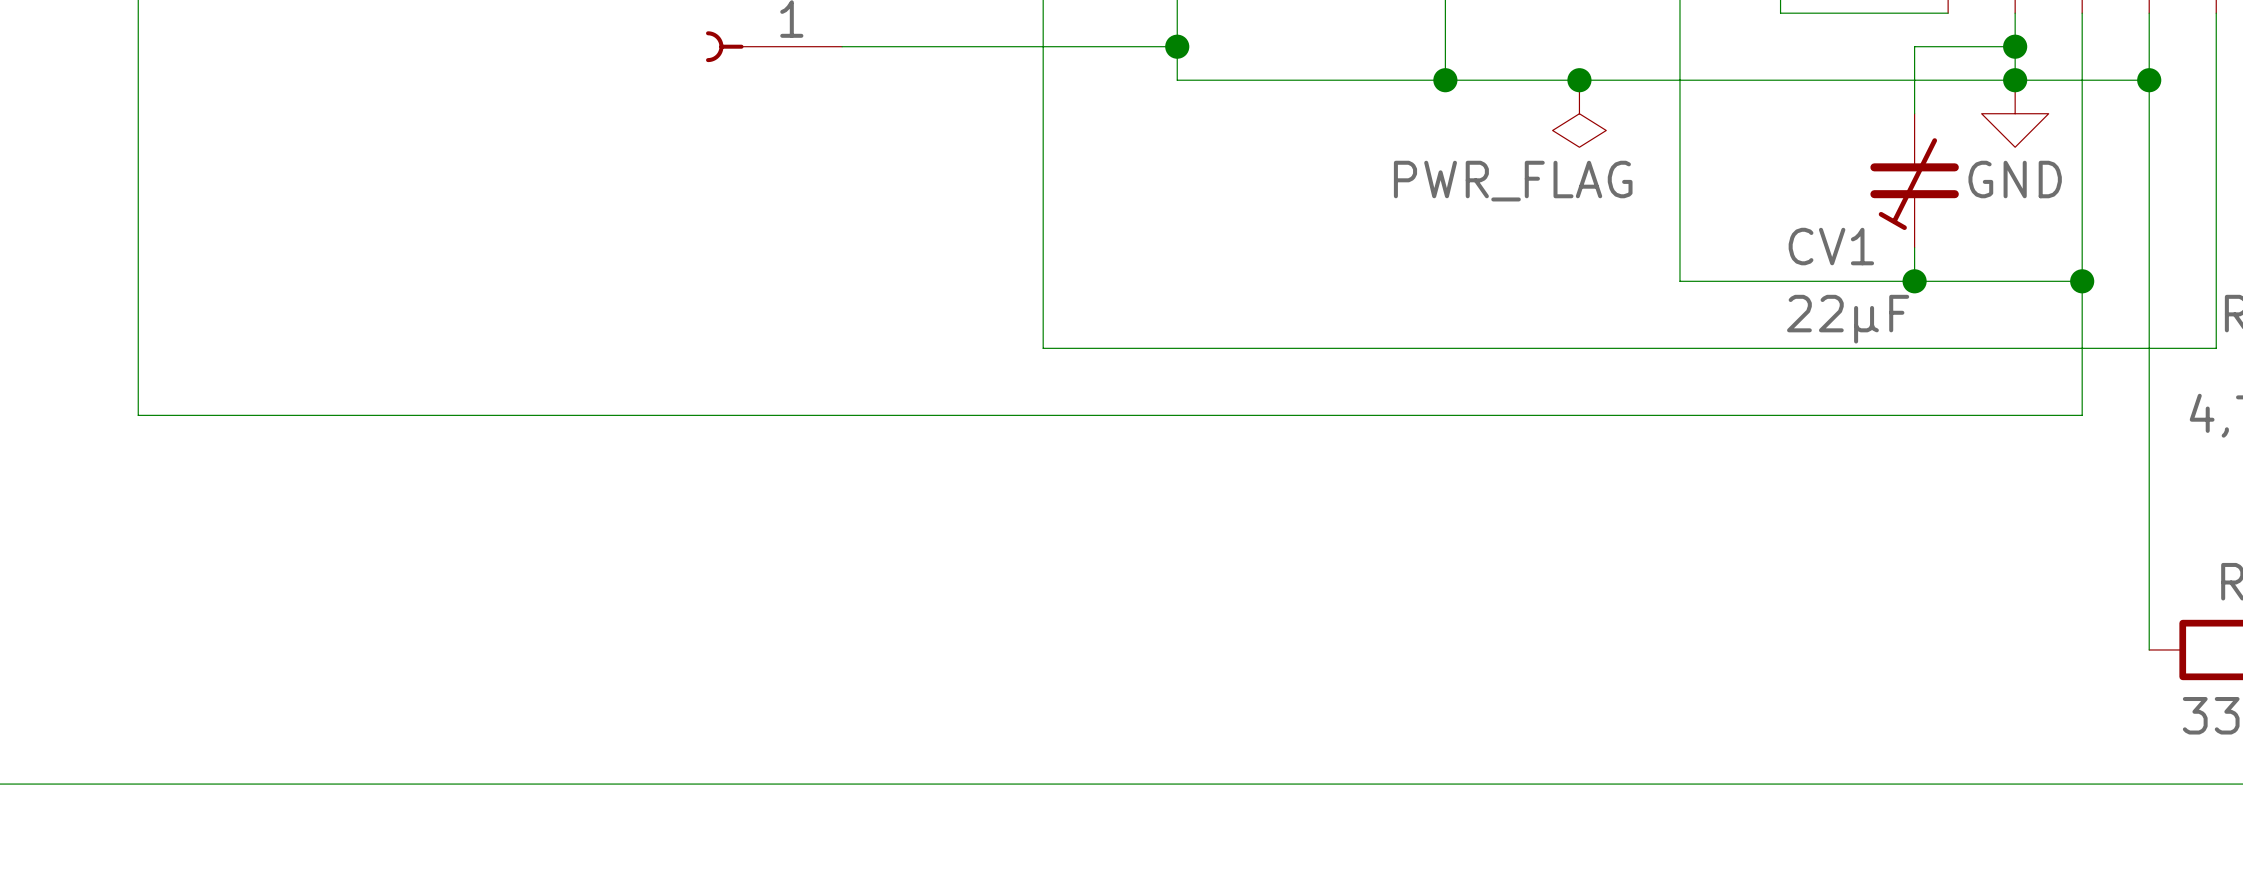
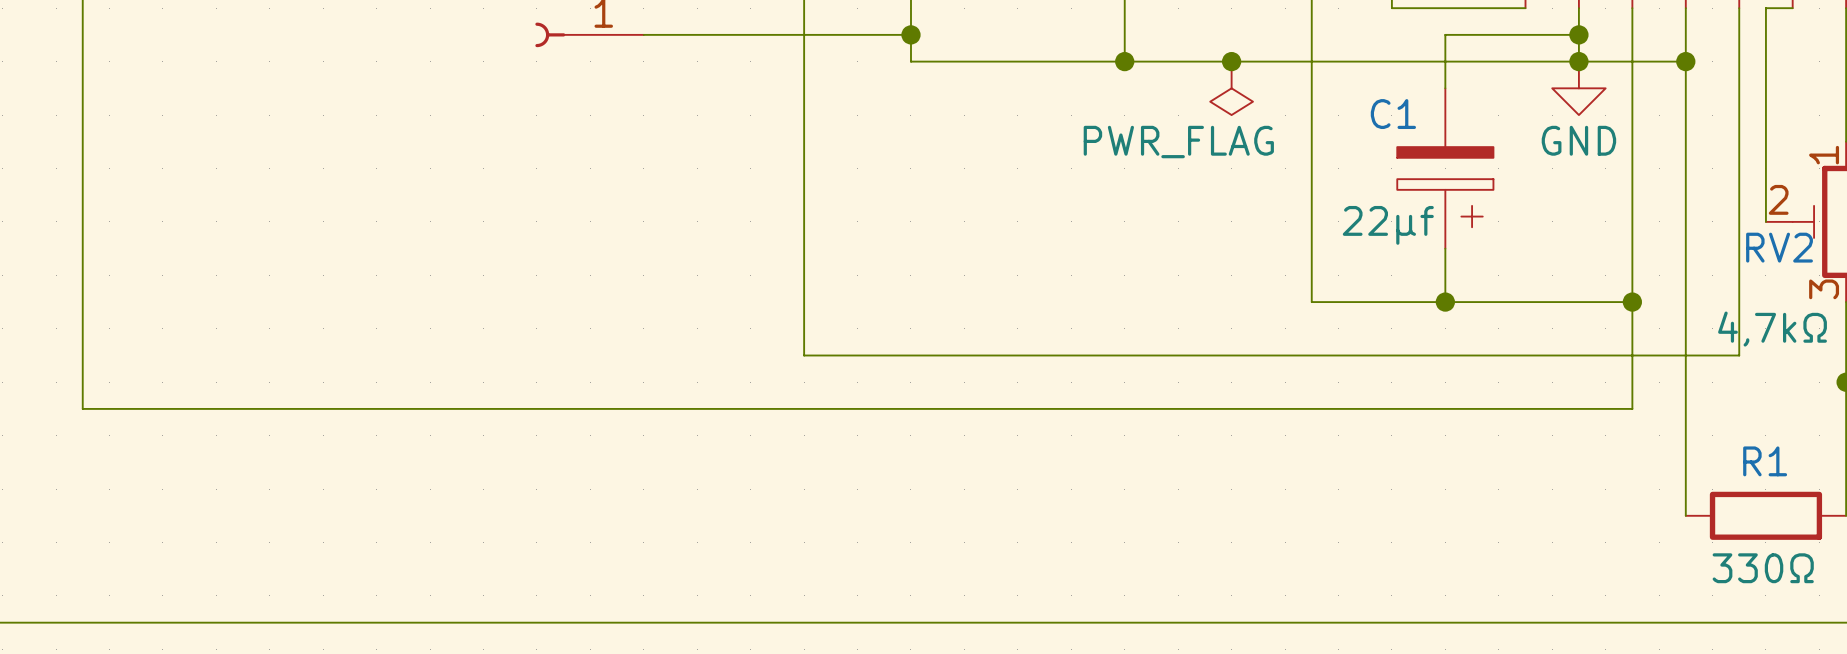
wire: (1914, 46) (1914, 113) -> (1498, 34) (1445, 34) (1445, 88)
CV1: 22µF (1914, 180) -> none
C1: none -> 22µf (1445, 168)
wire: (1914, 247) (1914, 281) -> none
wire: (1679, 281) (2082, 281) -> (1311, 221) (1311, 302) (1632, 302)
junction: (1914, 281) -> none
junction: (2082, 281) -> none
wire: none -> (1445, 248) (1445, 302)
wire: (1043, 348) (2216, 348) -> (804, 275) (804, 355) (1739, 355) (1739, 275)
junction: none -> (1445, 302)
junction: none -> (1632, 302)
wire: (138, 415) (2082, 415) -> (82, 328) (82, 408) (1632, 408) (1632, 328)

